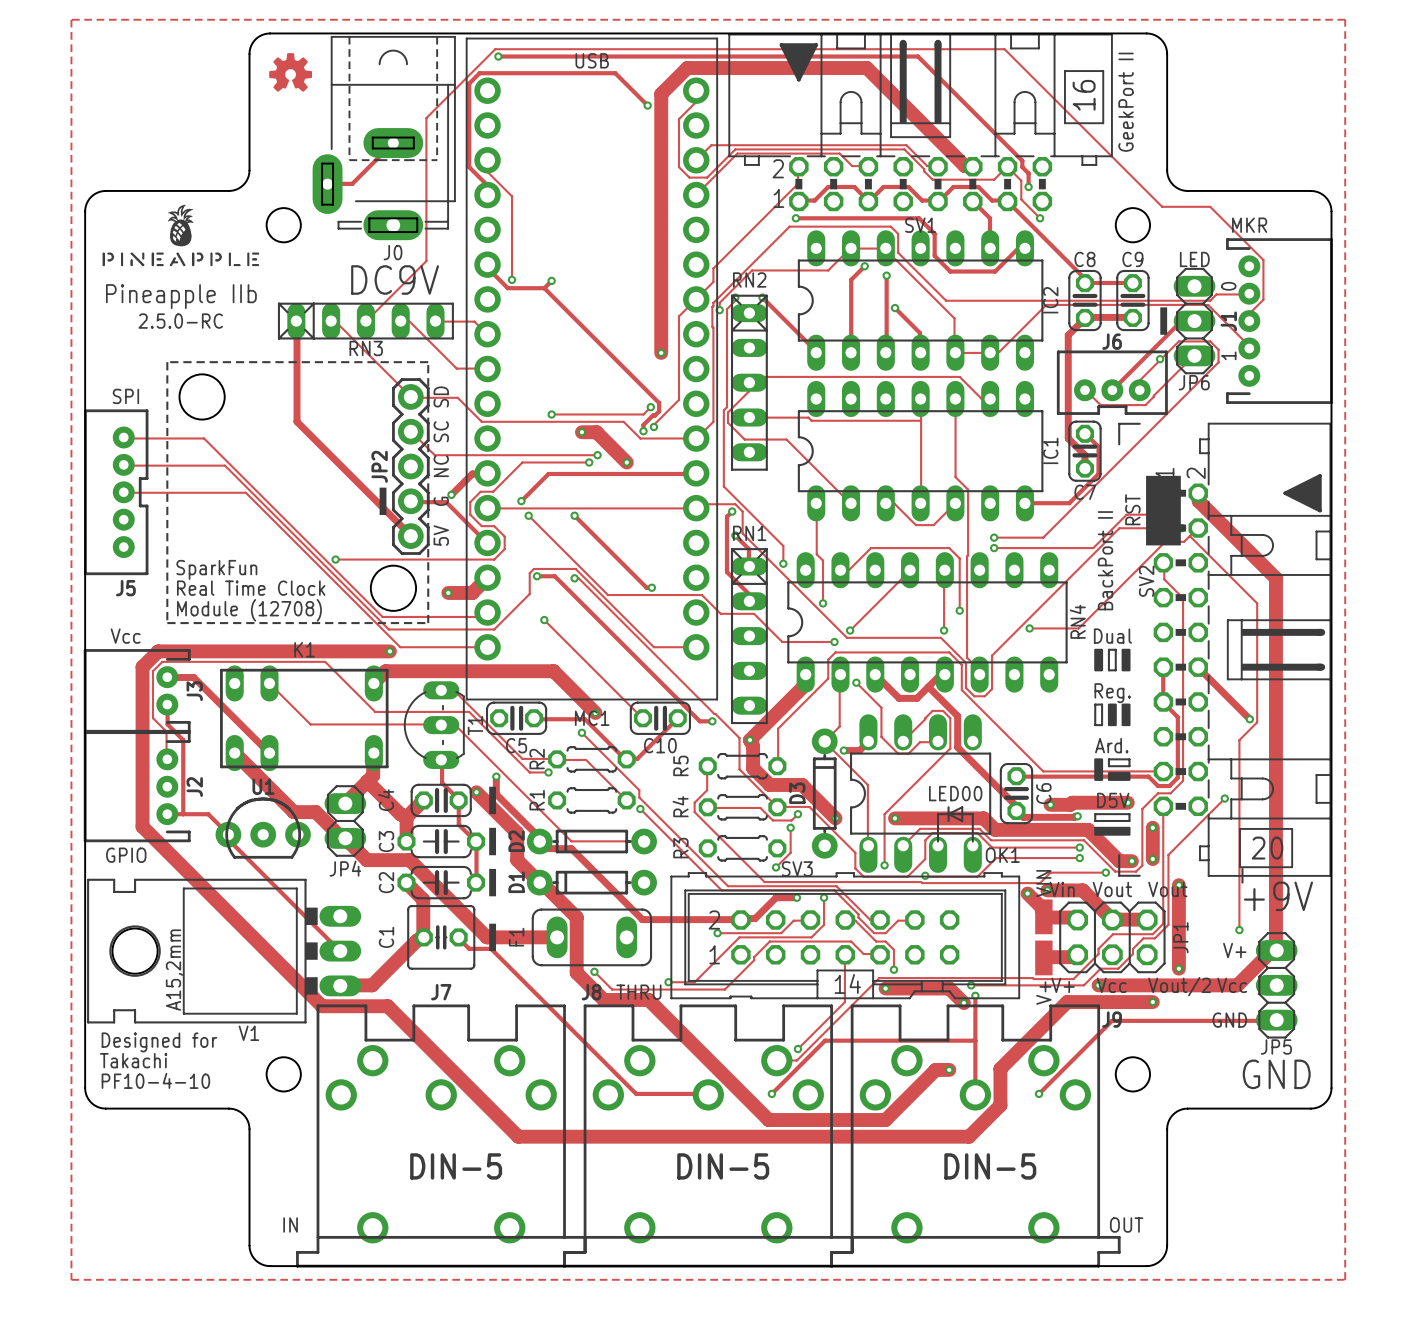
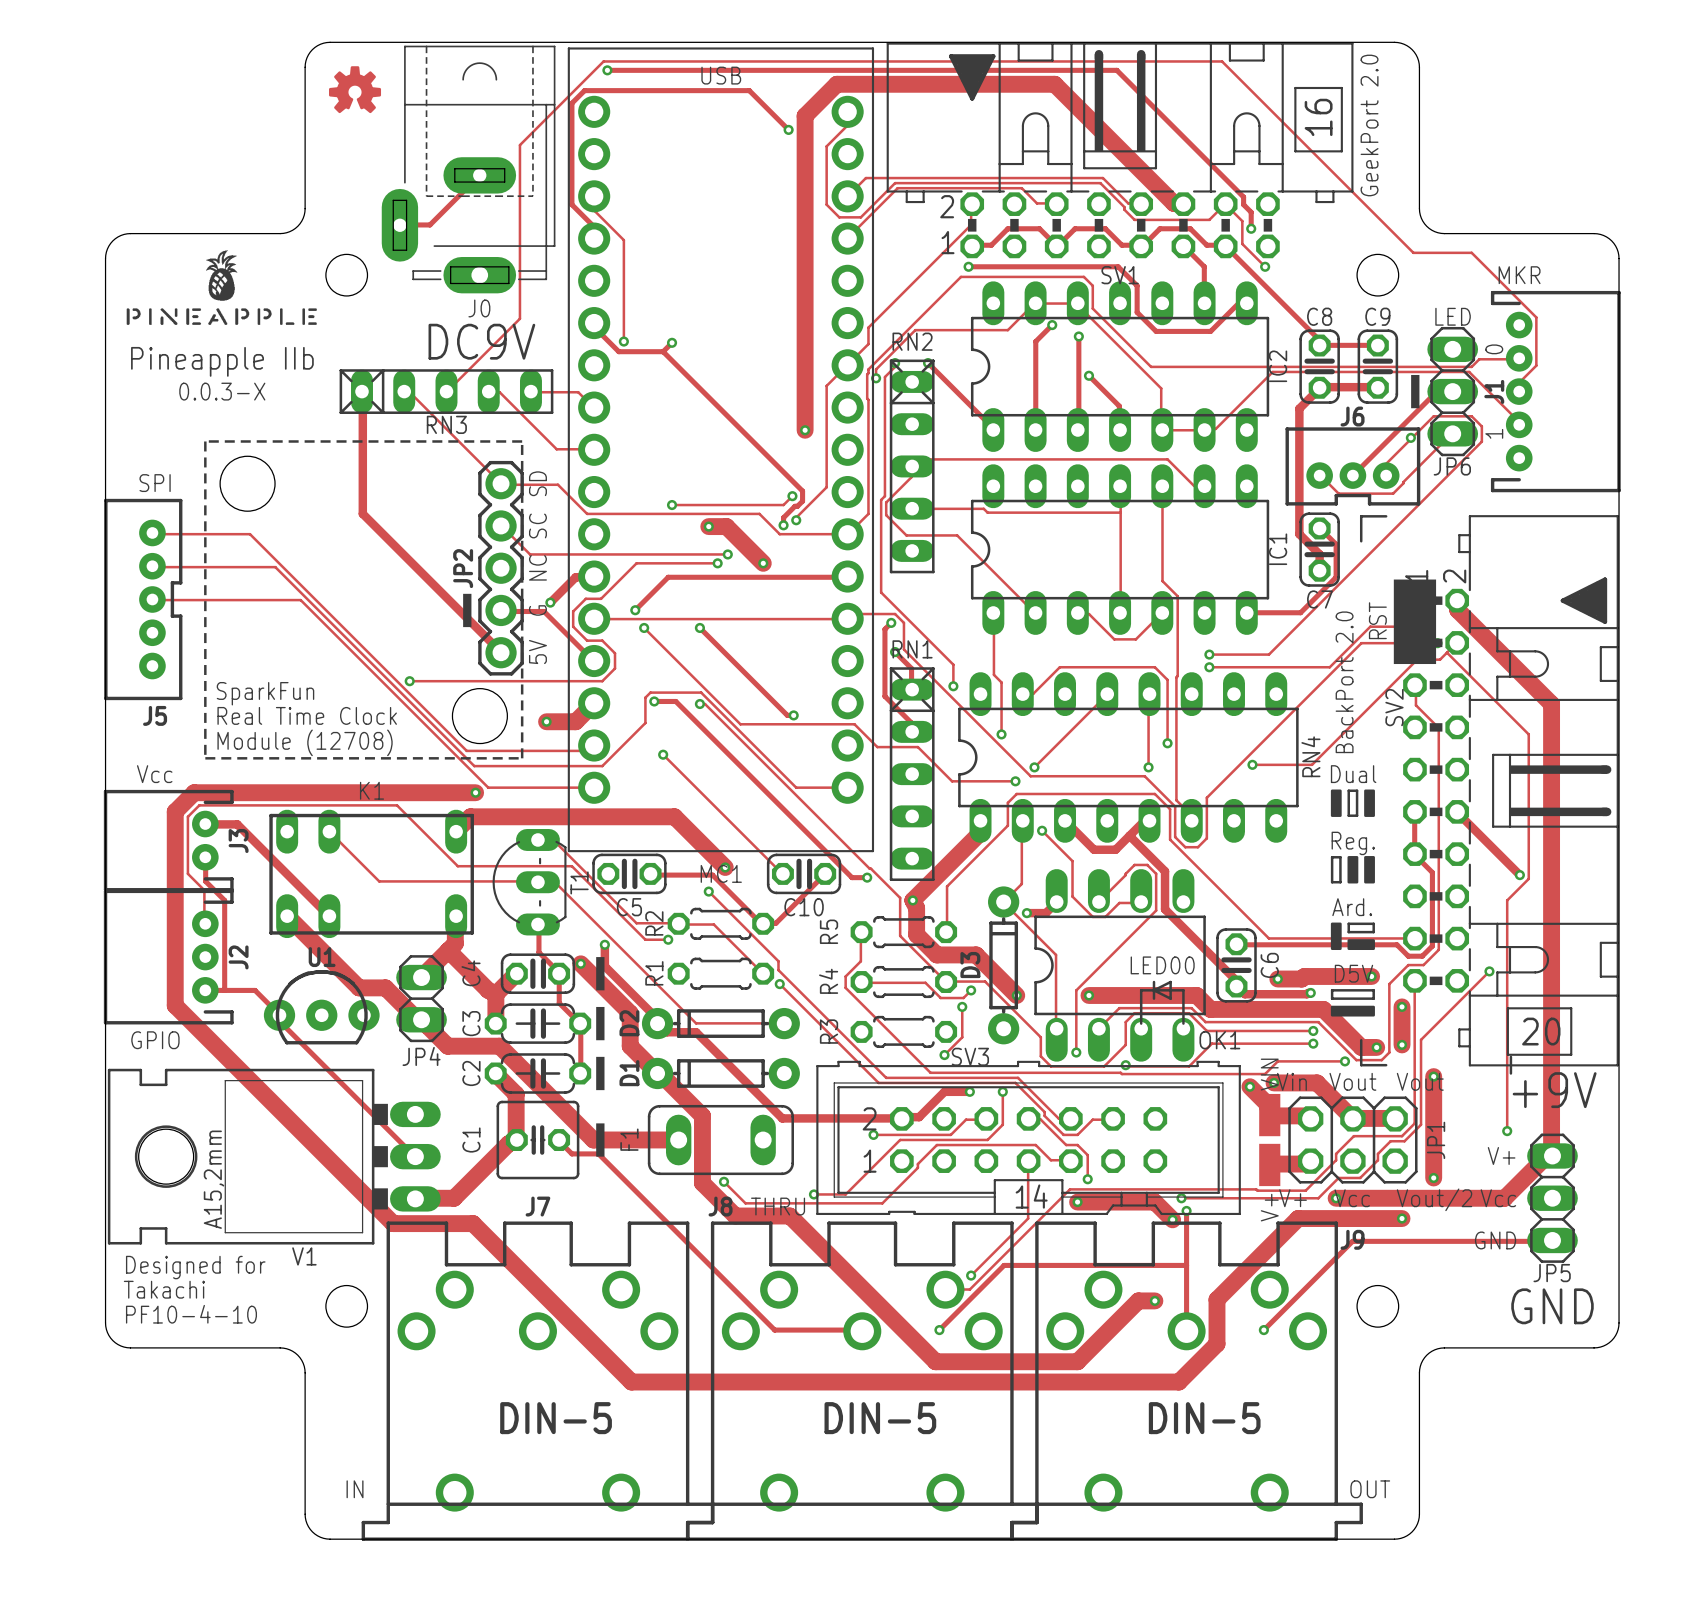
zone outline: (71, 19) (1345, 19) (1345, 1279) (71, 1279) (71, 19) -> none
text: GeekPort II (1126, 102) -> GeekPort 2.0 (1369, 125)
text: 2.5.0-RC (180, 321) -> 0.0.3-X (222, 391)
text: BackPort II (1105, 560) -> BackPort 2.0 (1344, 682)

